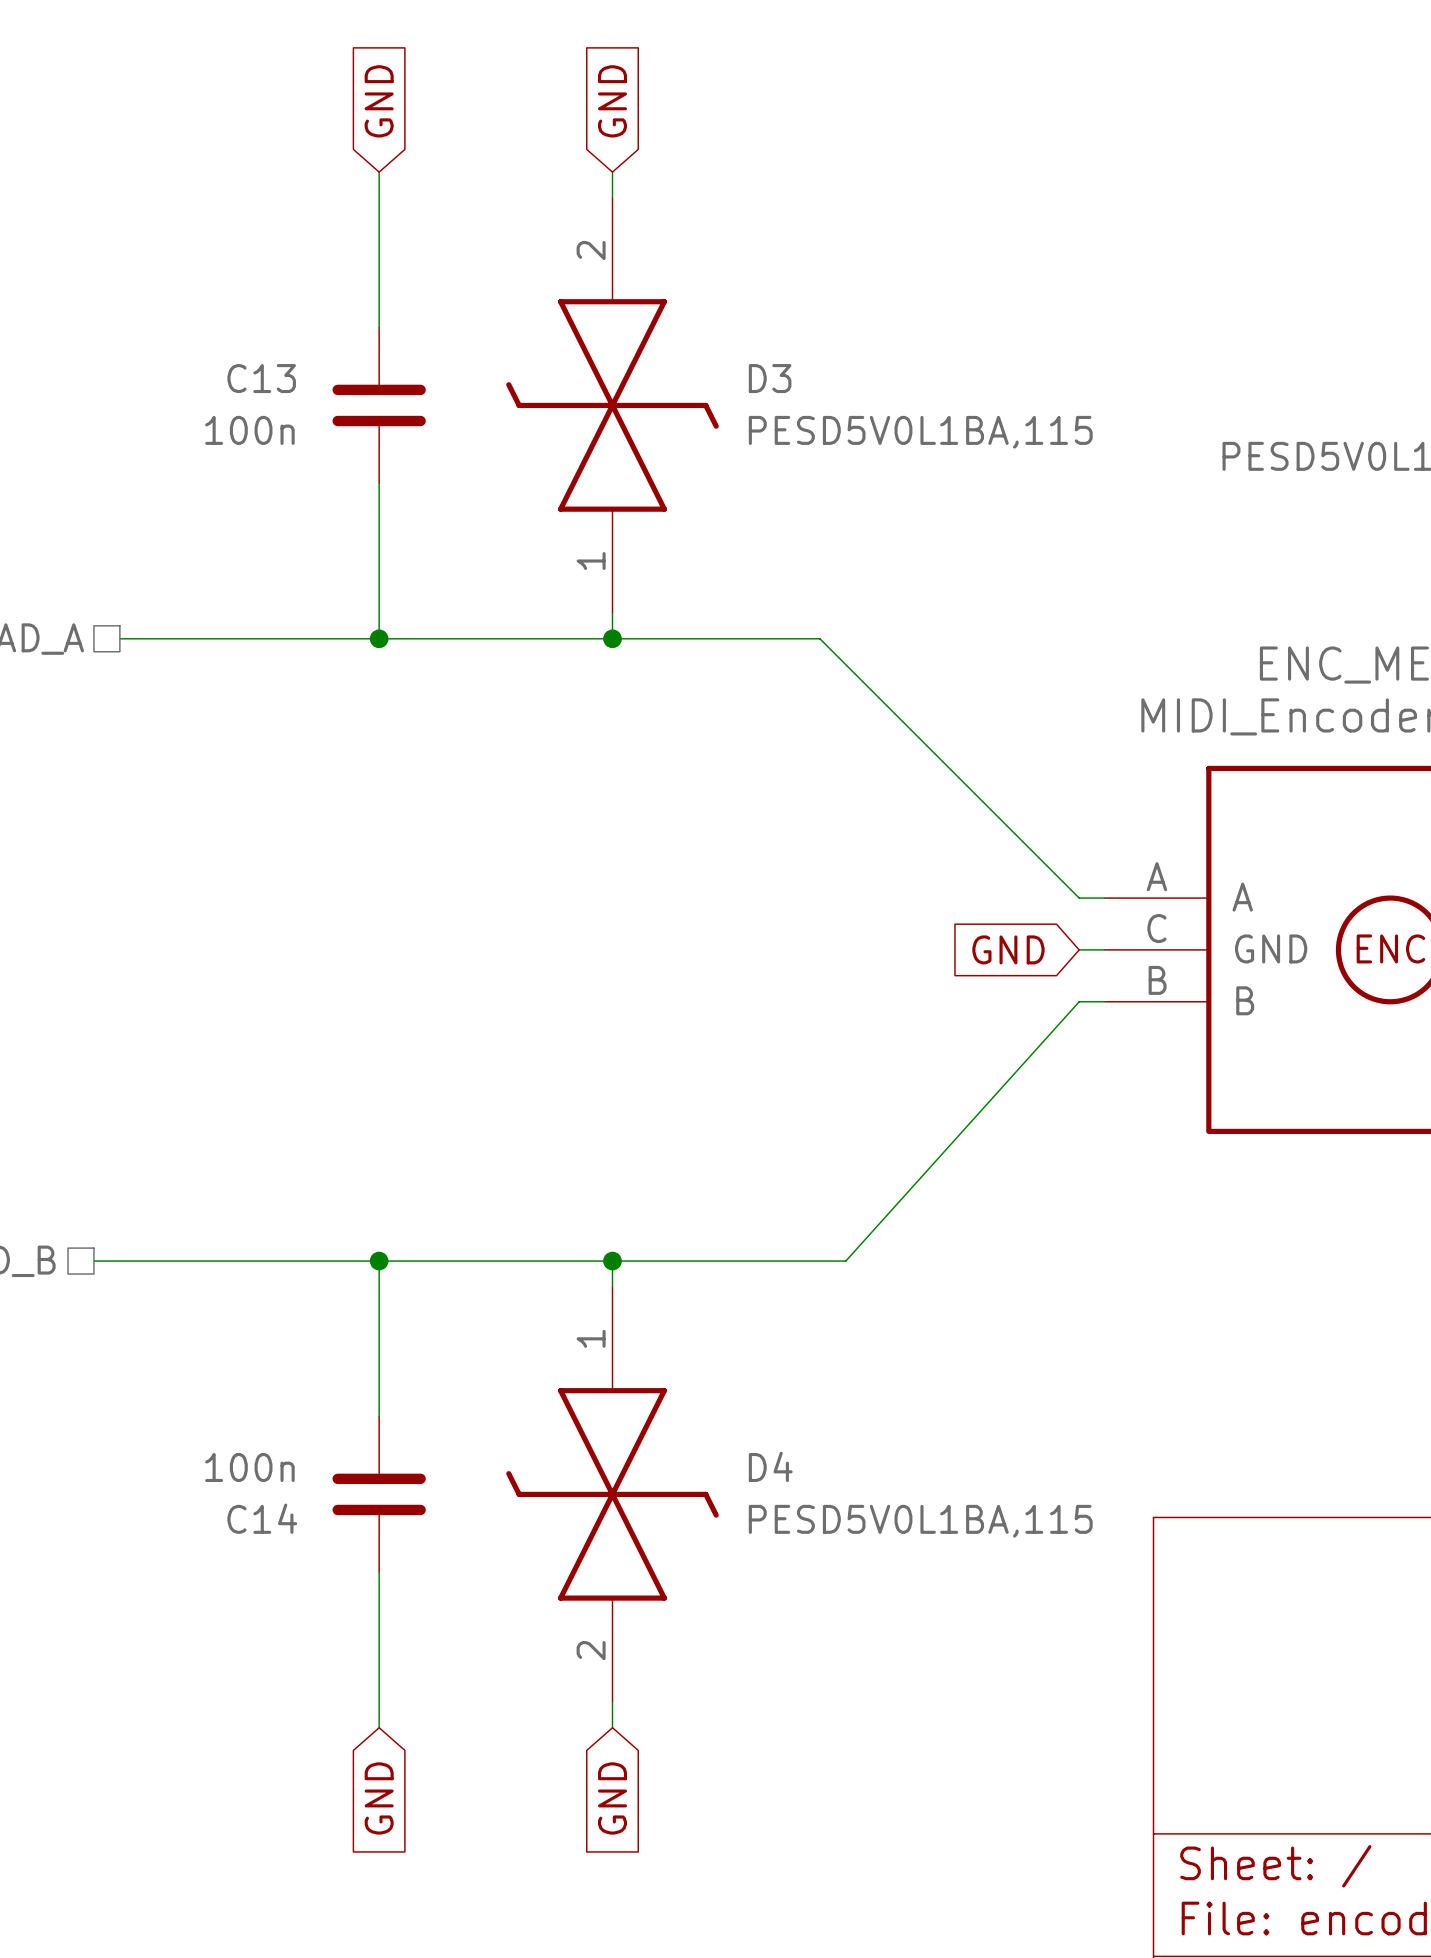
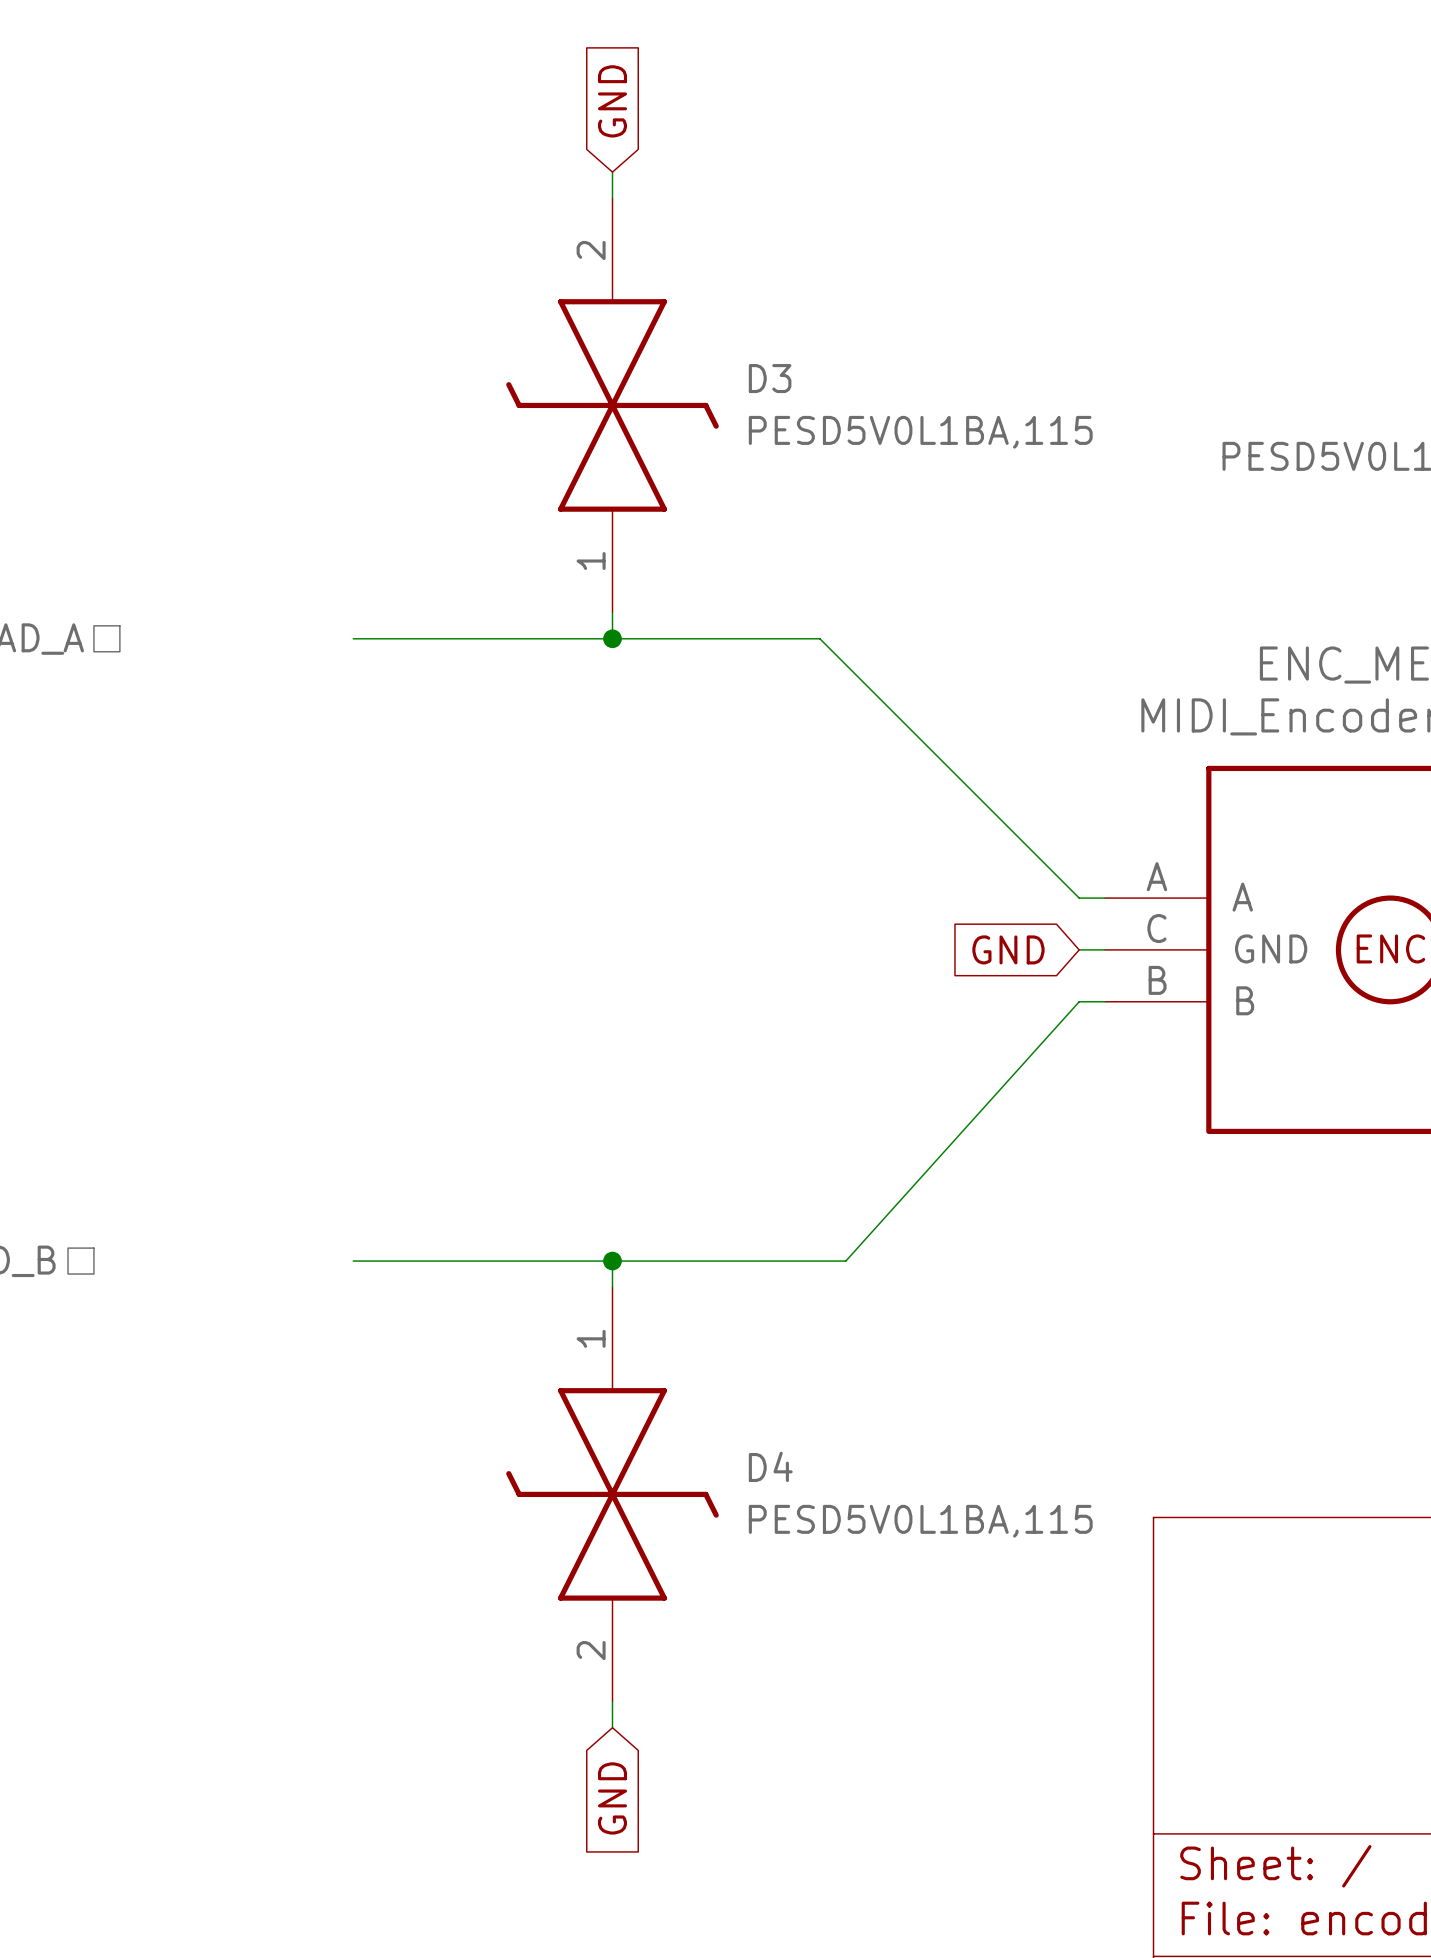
global label: GND (379, 101) -> none
wire: (379, 172) (379, 327) -> none
C13: 100n (379, 405) -> none
wire: (379, 483) (379, 638) -> none
wire: (119, 638) (353, 638) -> none
junction: (379, 638) -> none
wire: (93, 1261) (353, 1261) -> none
wire: (379, 1261) (379, 1416) -> none
junction: (379, 1261) -> none
C14: 100n (379, 1494) -> none
wire: (379, 1572) (379, 1727) -> none
global label: GND (379, 1798) -> none

